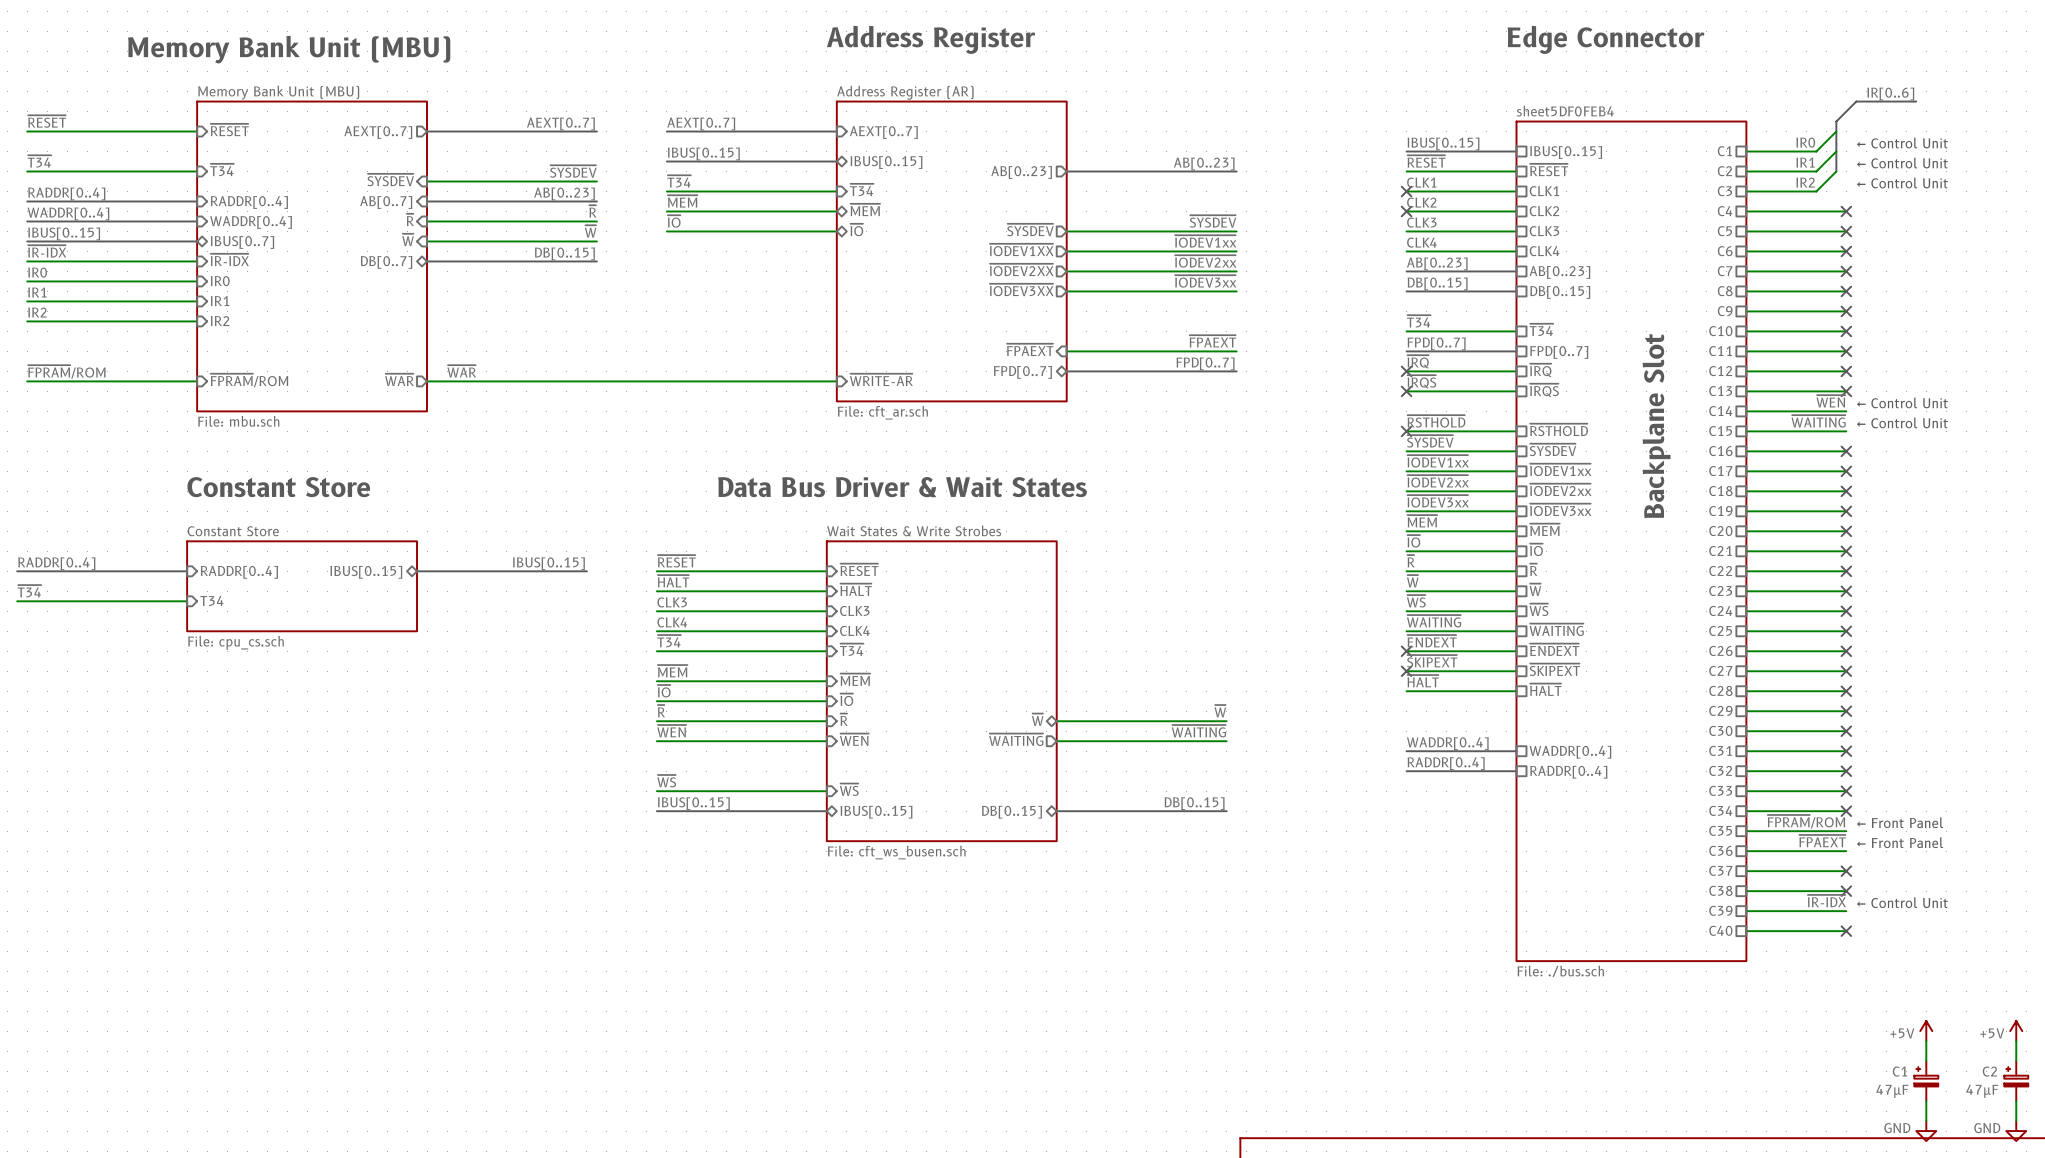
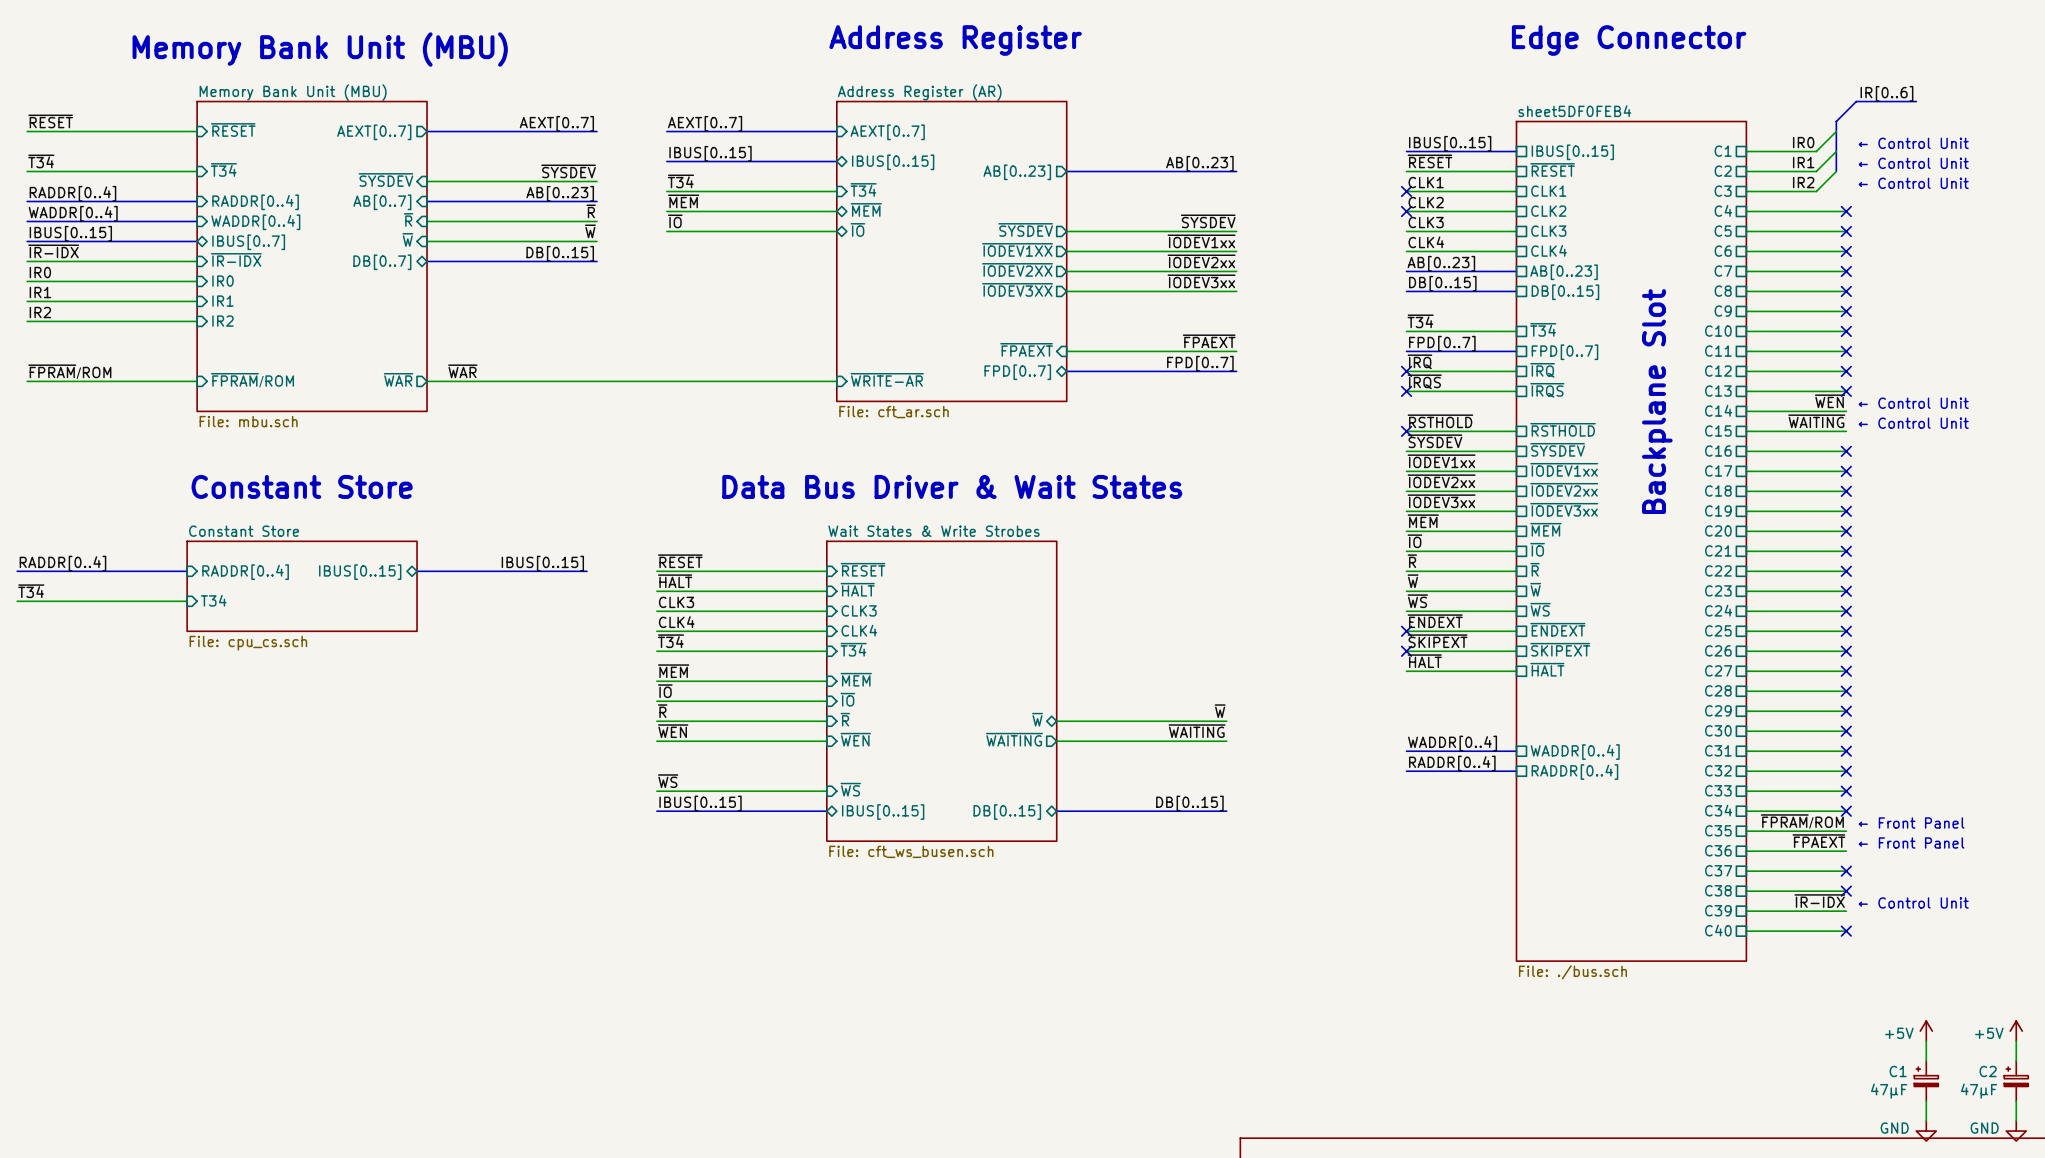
label: ~{WAITING} (1434, 621) -> ~{ENDEXT} (1435, 621)
sheet pin: ~{WAITING} (1556, 629) -> ~{ENDEXT} (1557, 629)
label: ~{ENDEXT} (1432, 641) -> ~{SKIPEXT} (1437, 641)
sheet pin: ~{ENDEXT} (1554, 649) -> ~{SKIPEXT} (1560, 649)
label: ~{SKIPEXT} (1432, 661) -> ~{HALT} (1424, 661)
sheet pin: ~{SKIPEXT} (1554, 669) -> ~{HALT} (1547, 669)
no-connect mark position: (1406, 671) -> (1406, 631)
label: ~{HALT} (1423, 681) -> none
sheet pin: ~{HALT} (1545, 689) -> none
wire: (1406, 691) (1516, 691) -> none

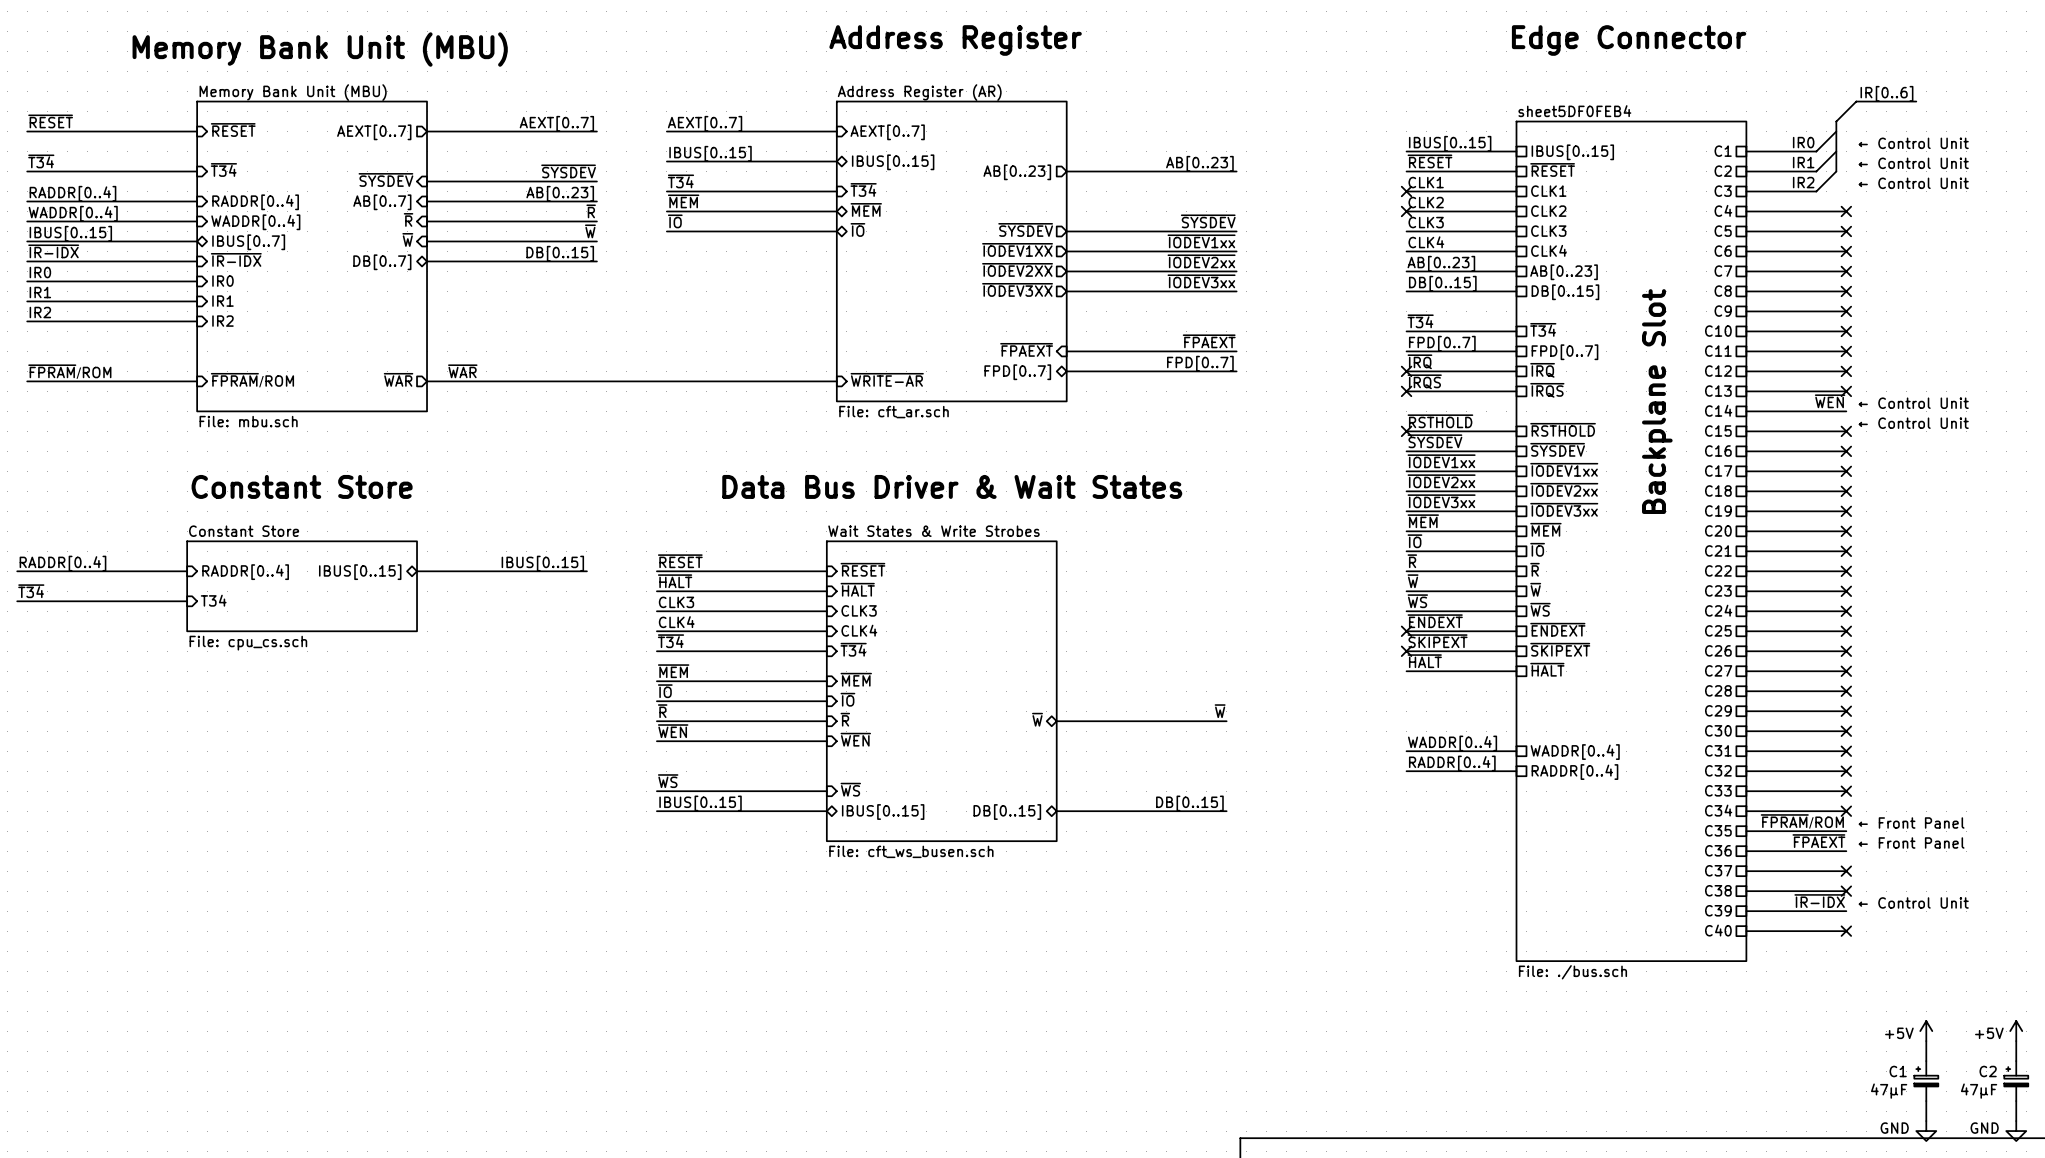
label: ~{WAITING} (1816, 421) -> none
no-connect mark: none -> (1846, 431)
label: ~{WAITING} (1197, 731) -> none
sheet pin: ~{WAITING} (1014, 739) -> none
wire: (1056, 741) (1226, 741) -> none

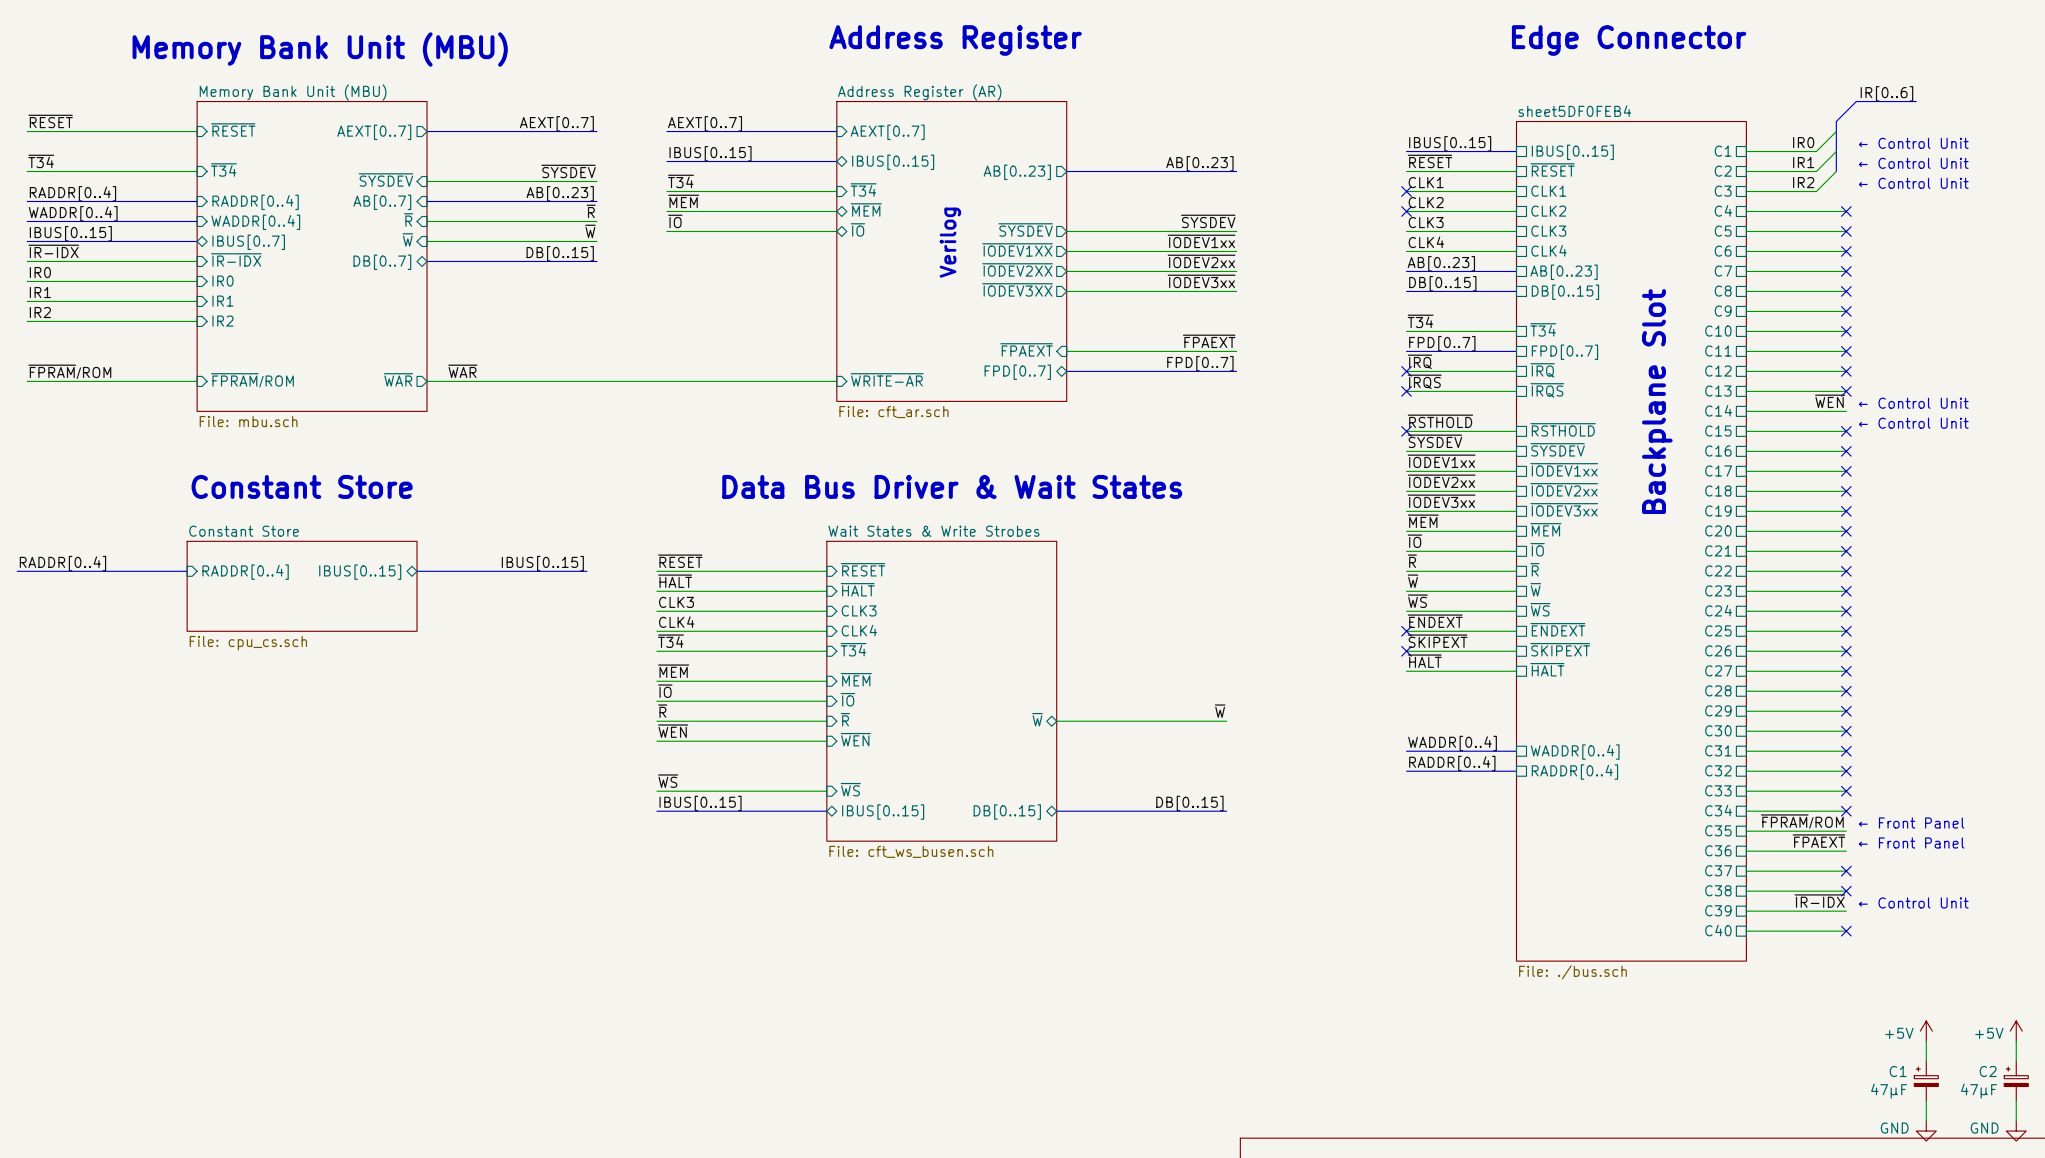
text: none -> Verilog (950, 242)
label: ~{T34} (31, 591) -> none
sheet pin: T34 (213, 600) -> none
wire: (17, 601) (187, 601) -> none

